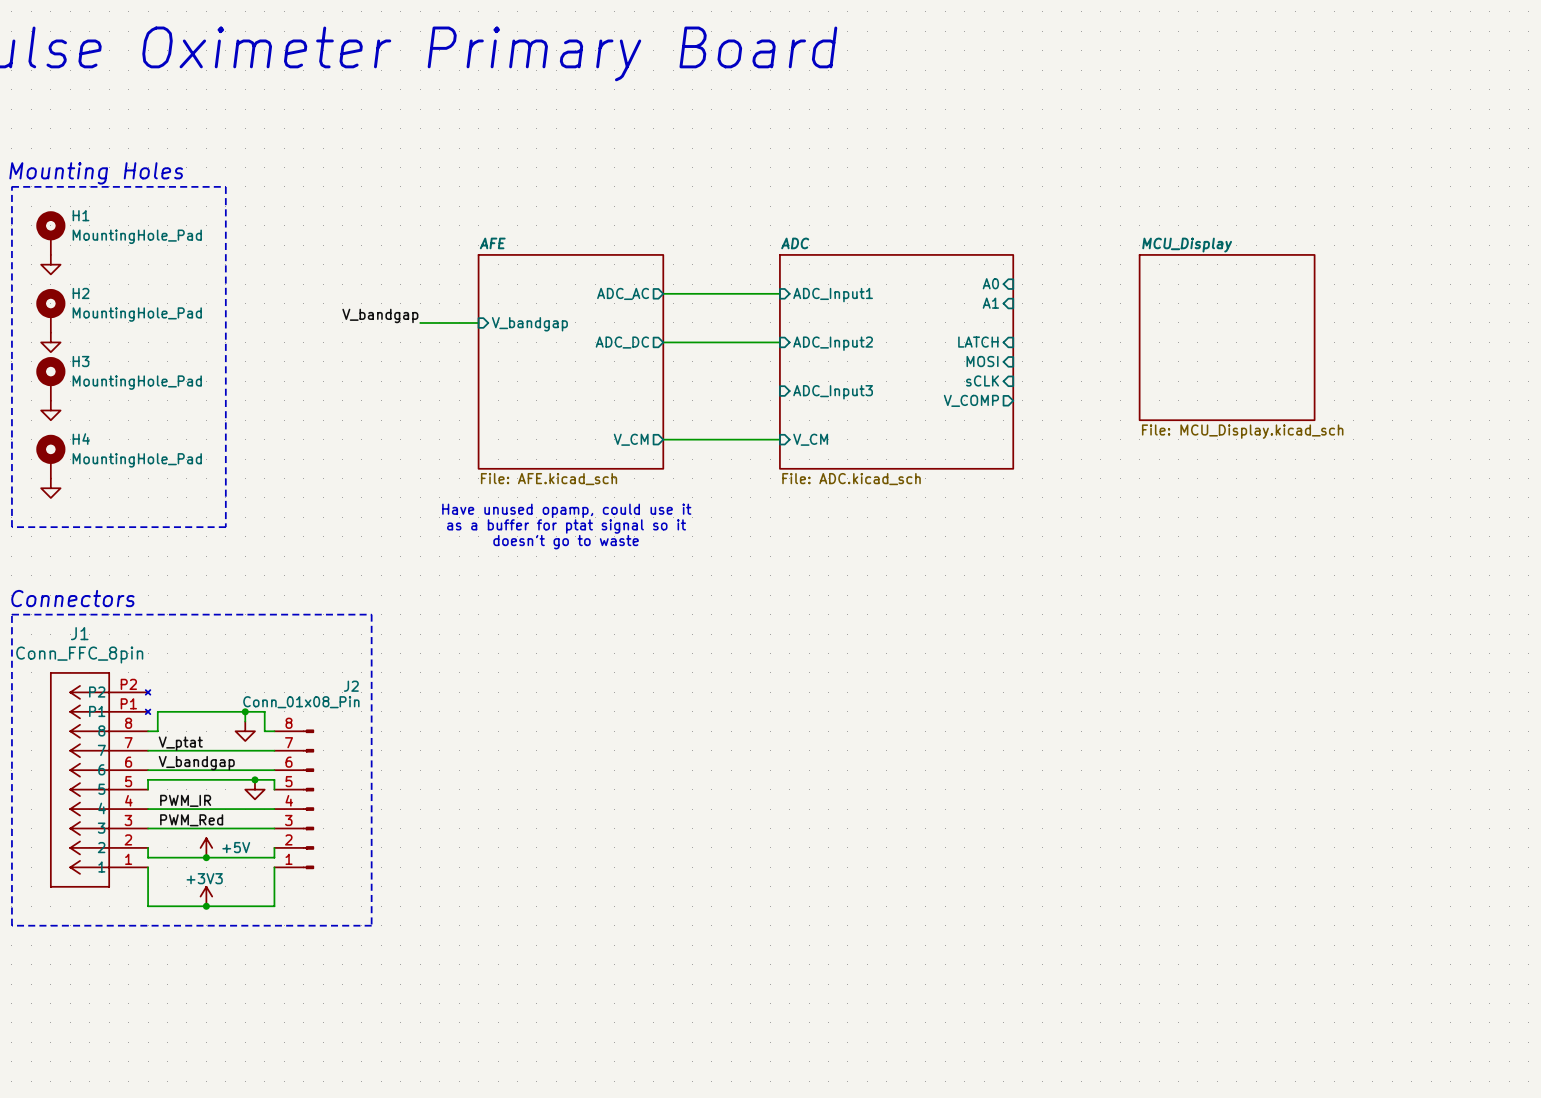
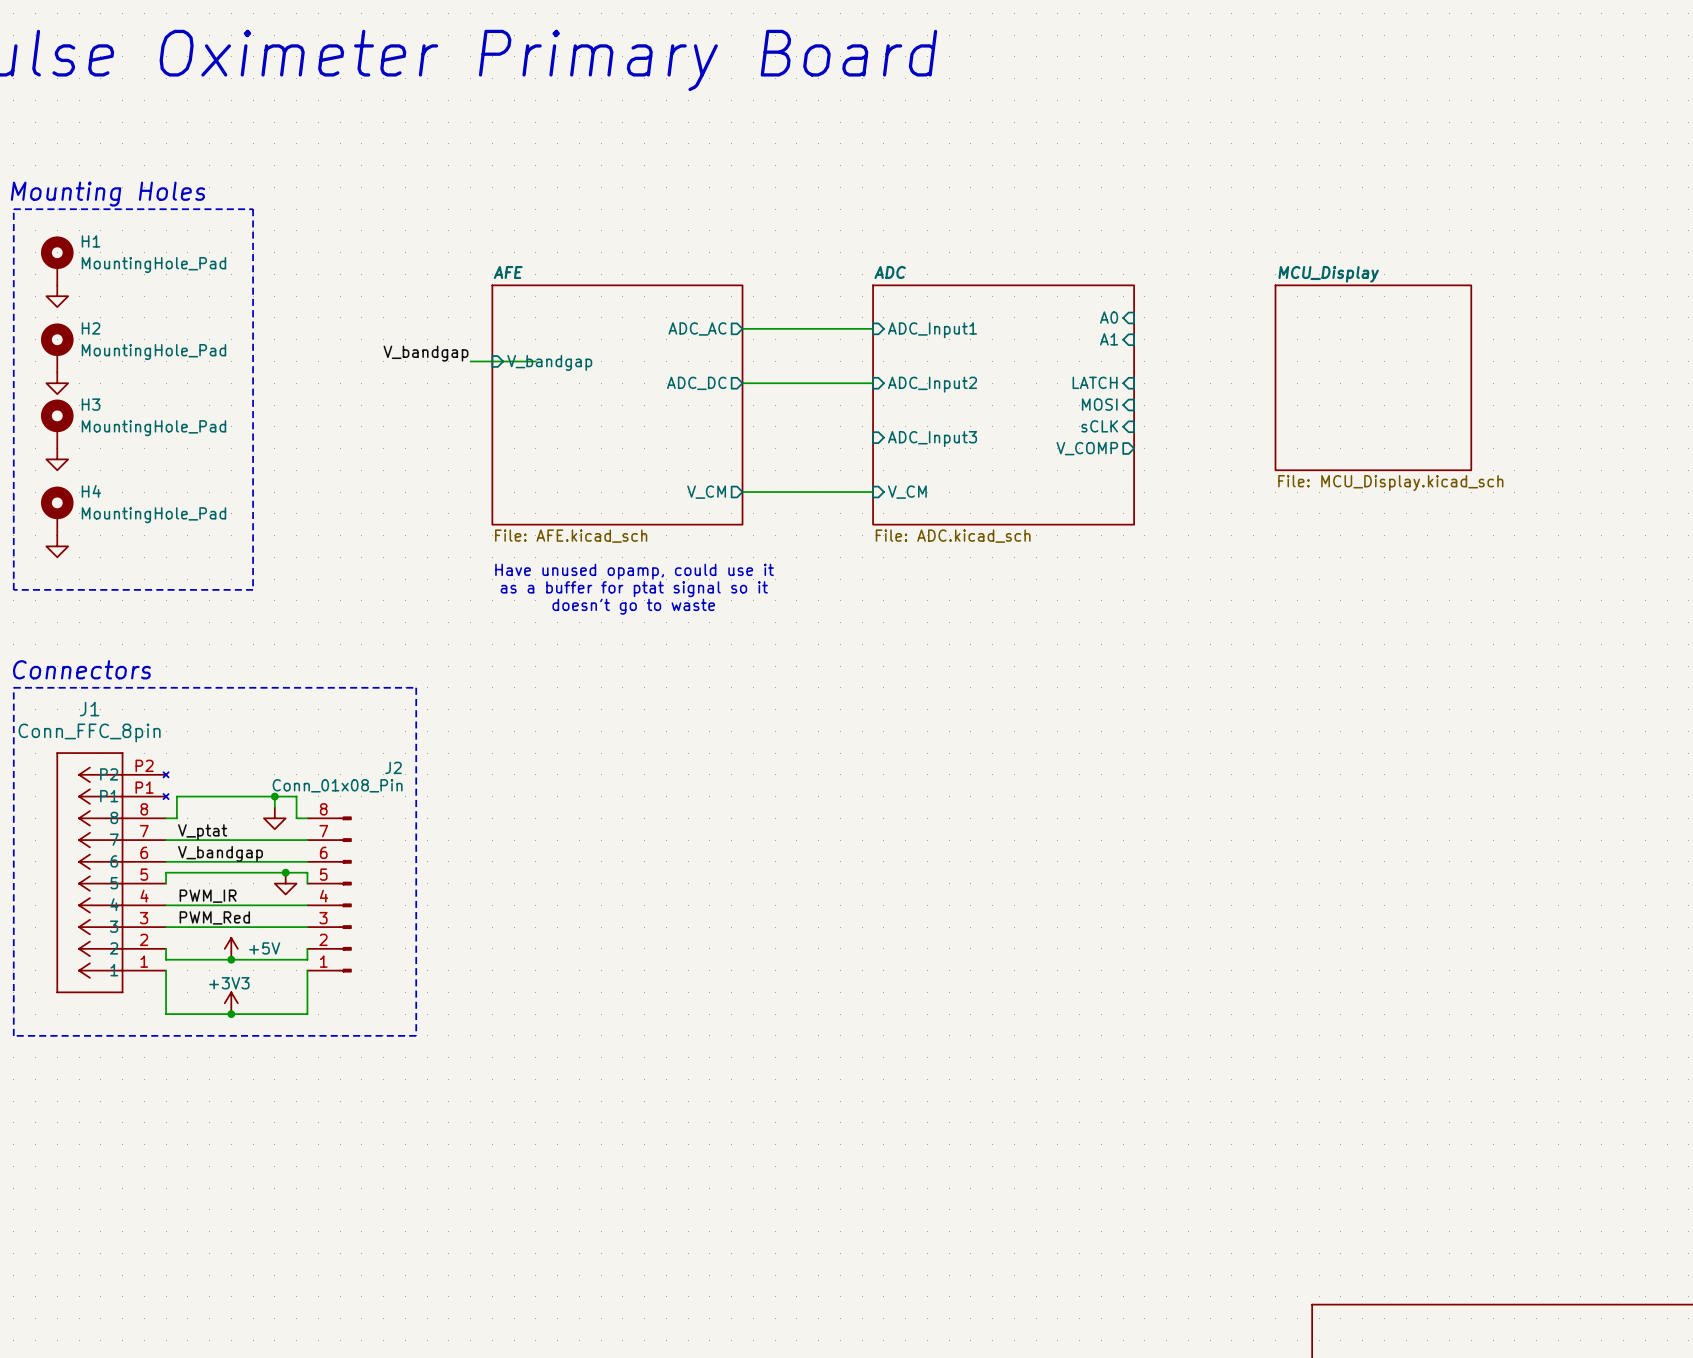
sheet pin position: V_bandgap (529, 324) -> V_bandgap (549, 362)
sheet AFE: none -> File: AFE.kicad_sch (617, 405)
sheet AFE: File: AFE.kicad_sch (570, 361) -> none

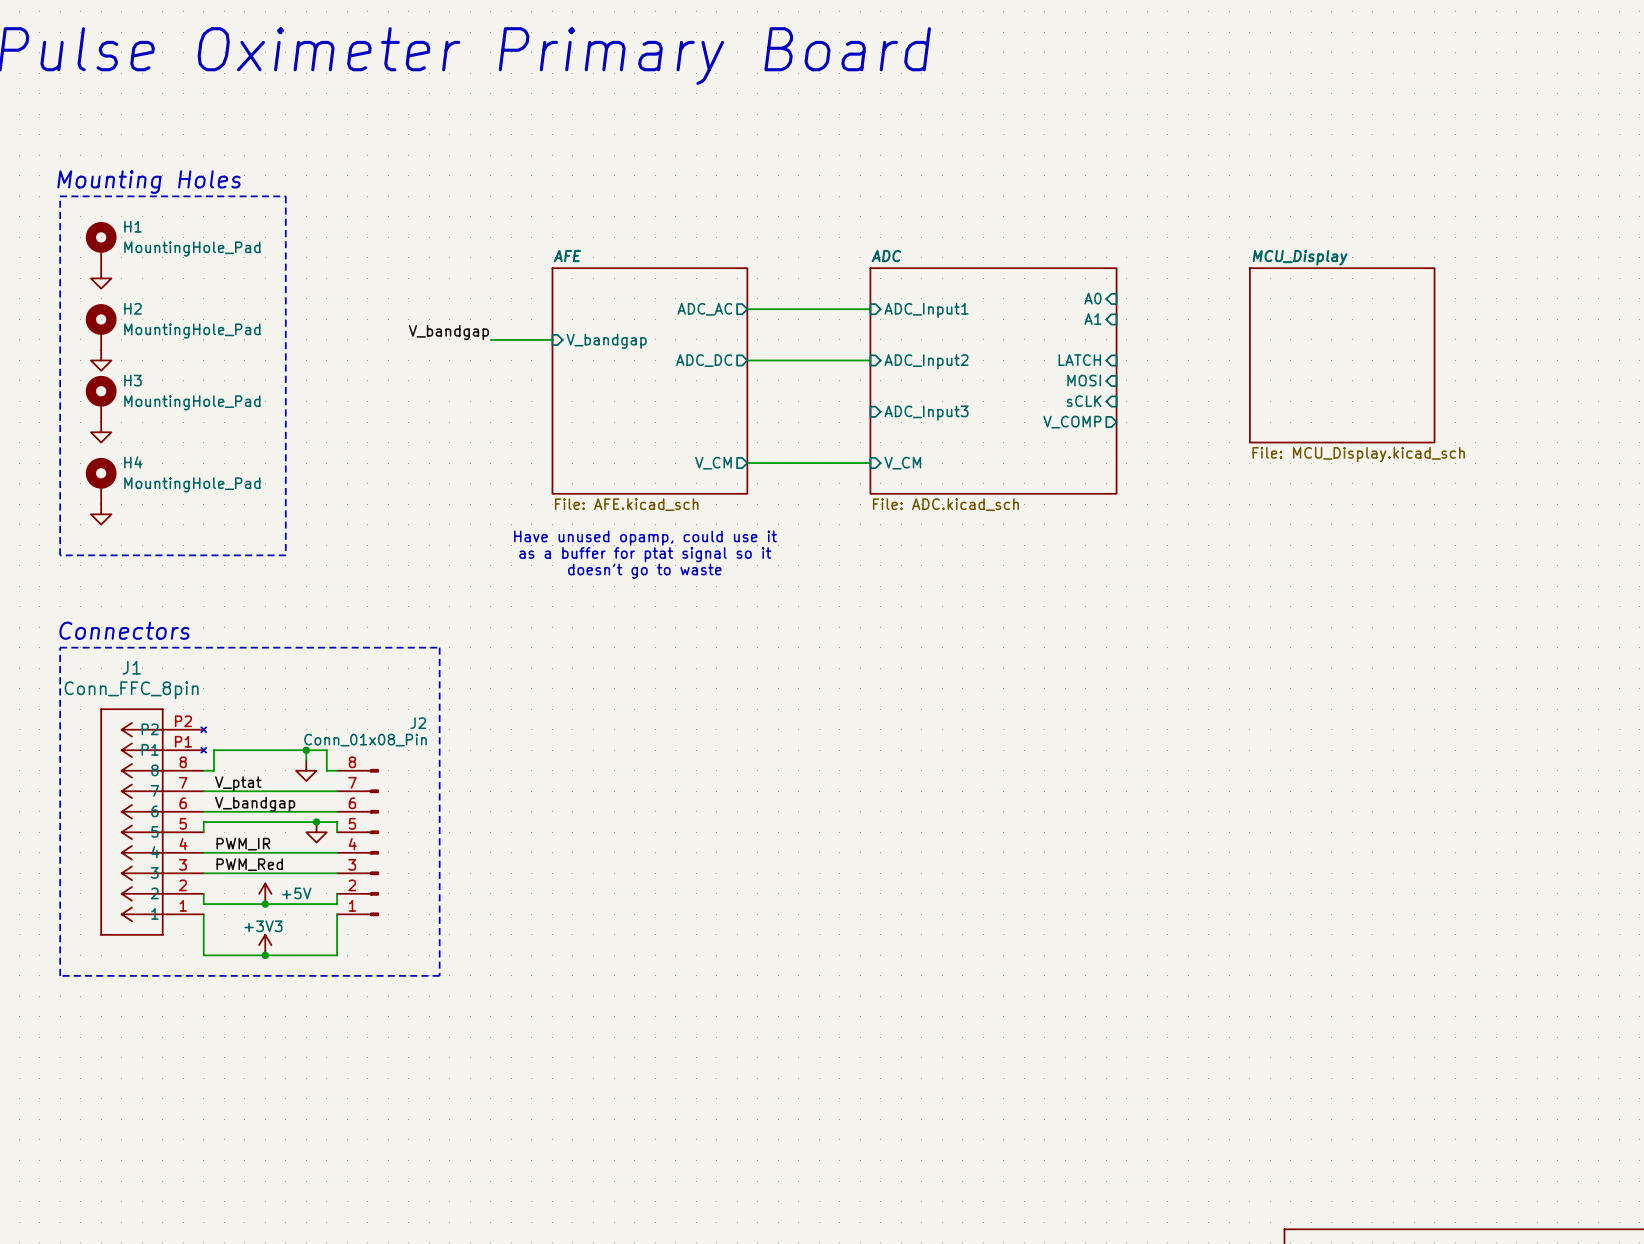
sheet pin position: V_bandgap (549, 362) -> V_bandgap (606, 341)
sheet AFE: File: AFE.kicad_sch (617, 405) -> none
sheet AFE: none -> File: AFE.kicad_sch (649, 380)

